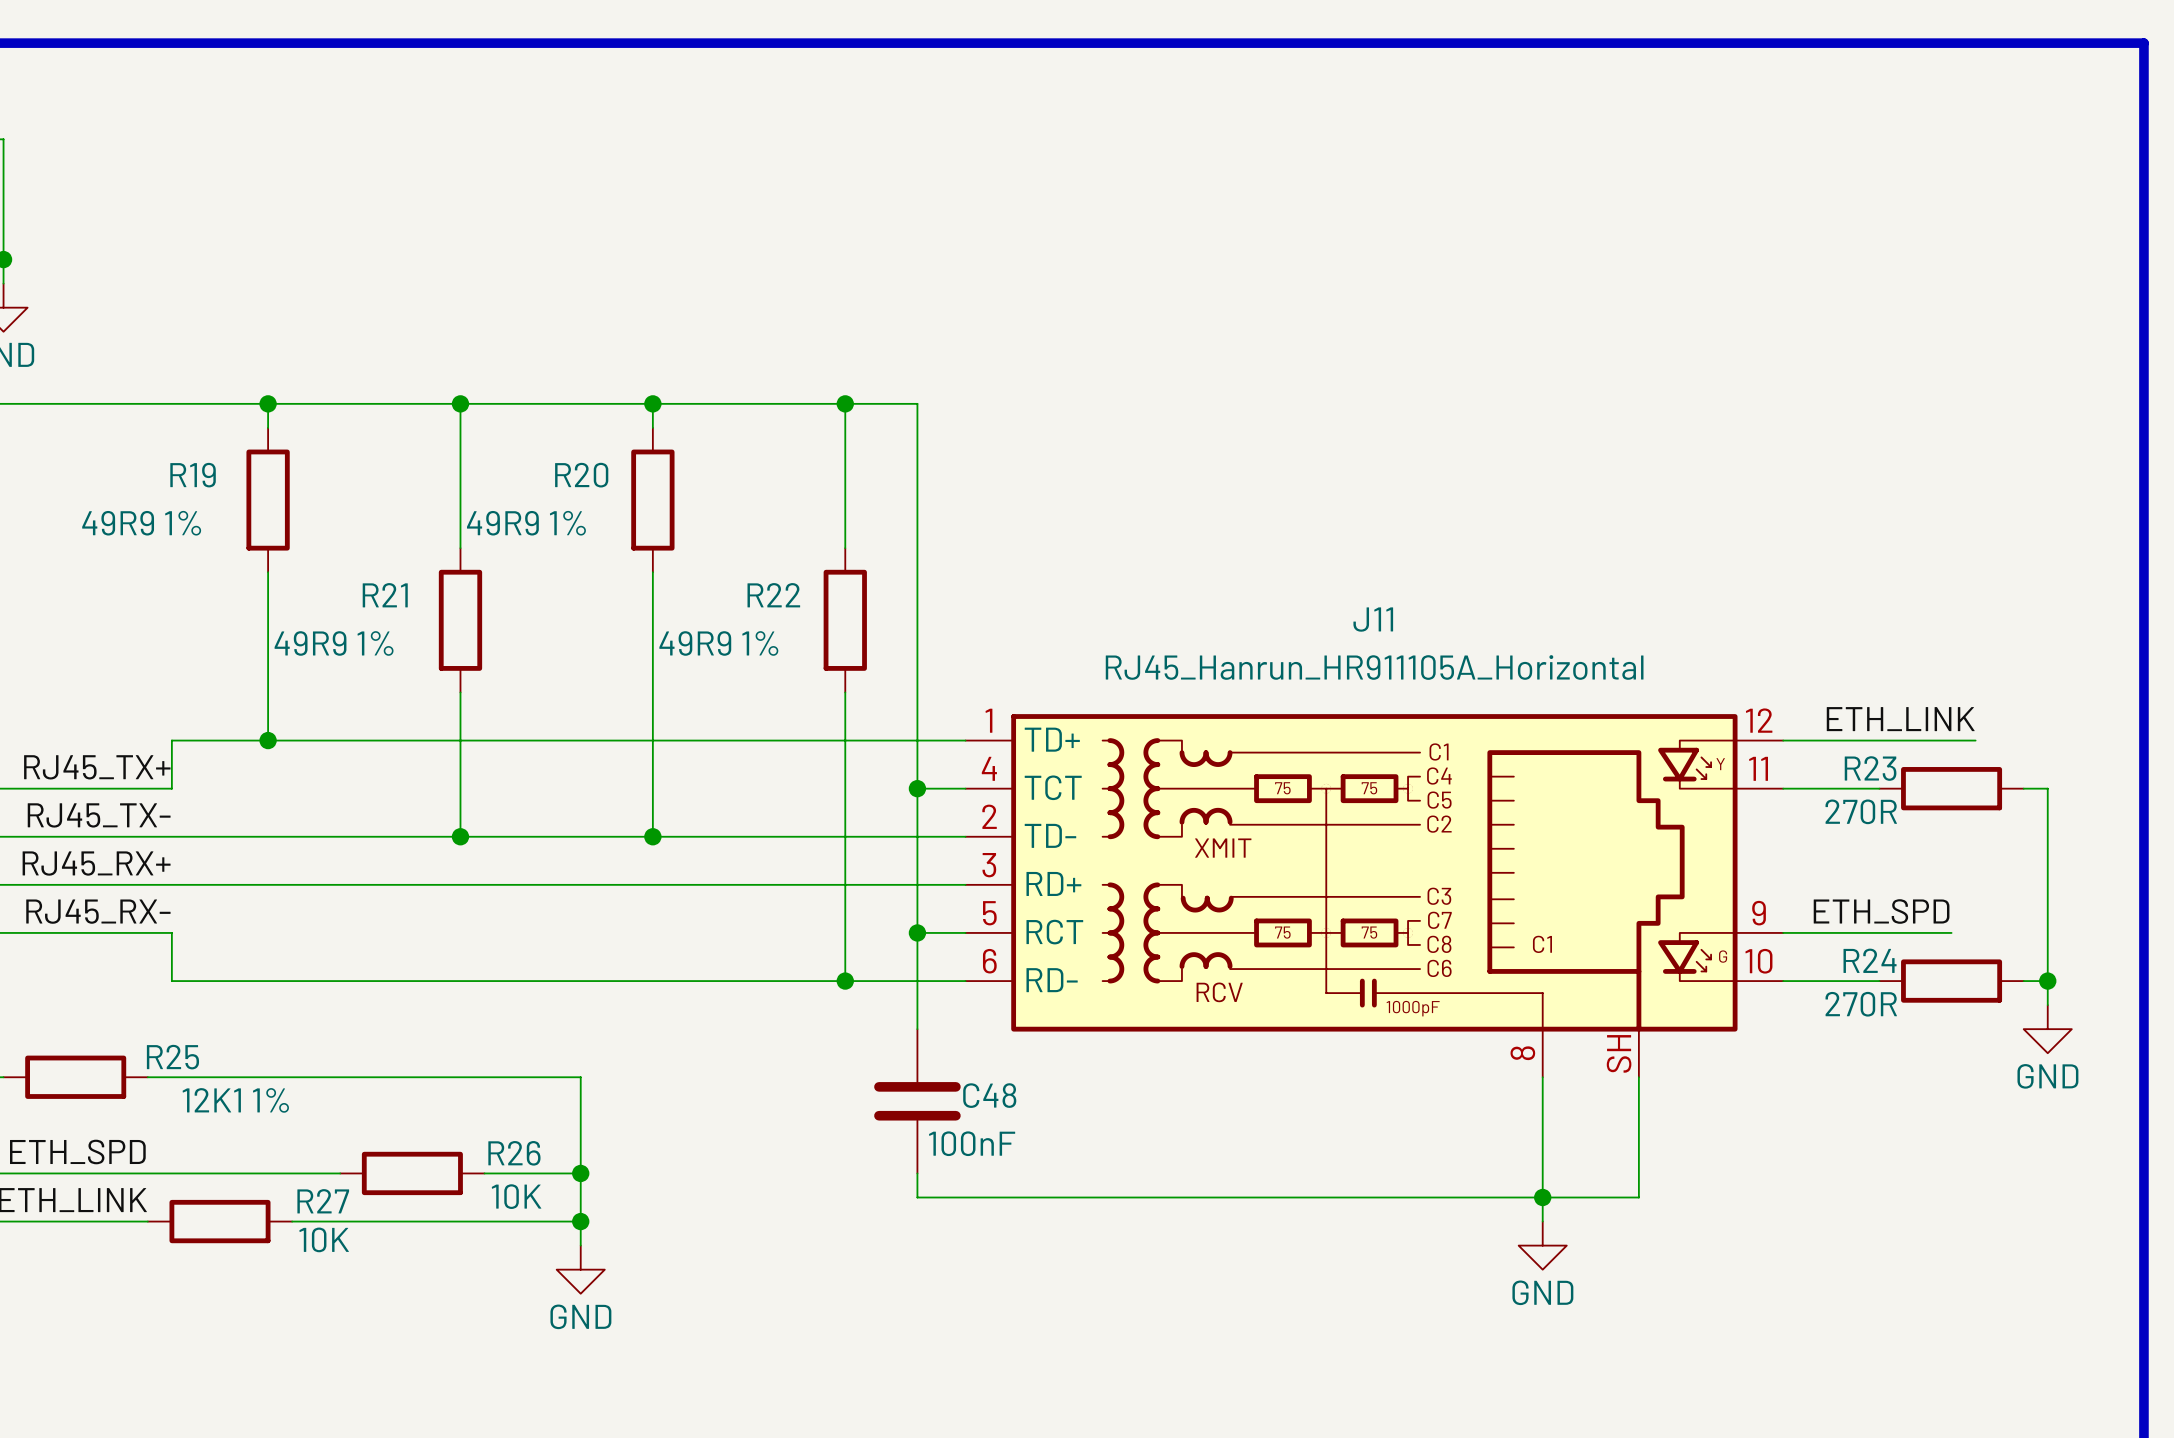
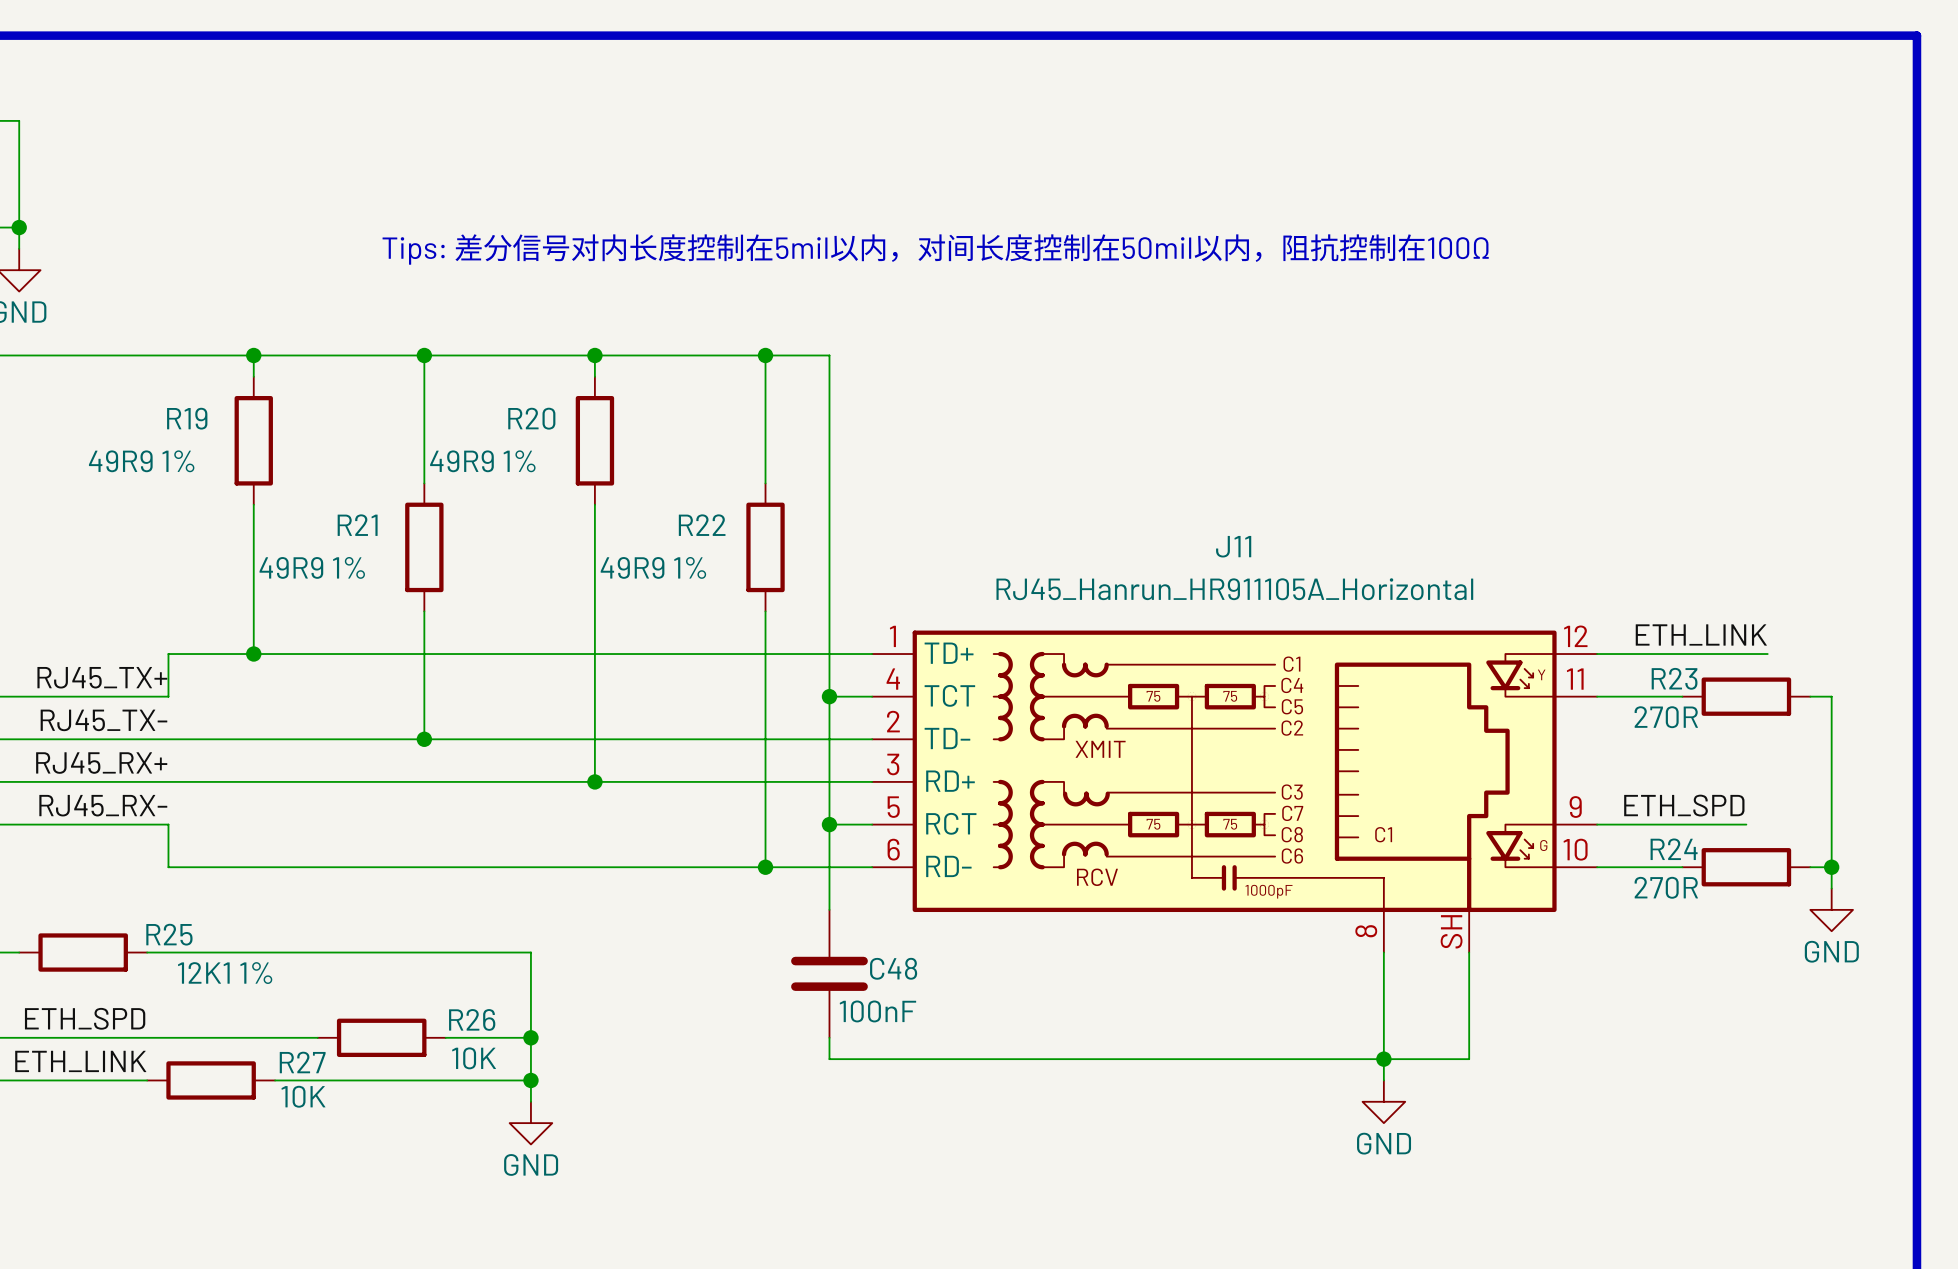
text: none -> Tips: 差分信号对内长度控制在5mil以内，对间长度控制在50mil以内，阻抗控制在100Ω (935, 249)
wire: none -> (594, 739) (594, 781)
junction position: (652, 836) -> (594, 781)

